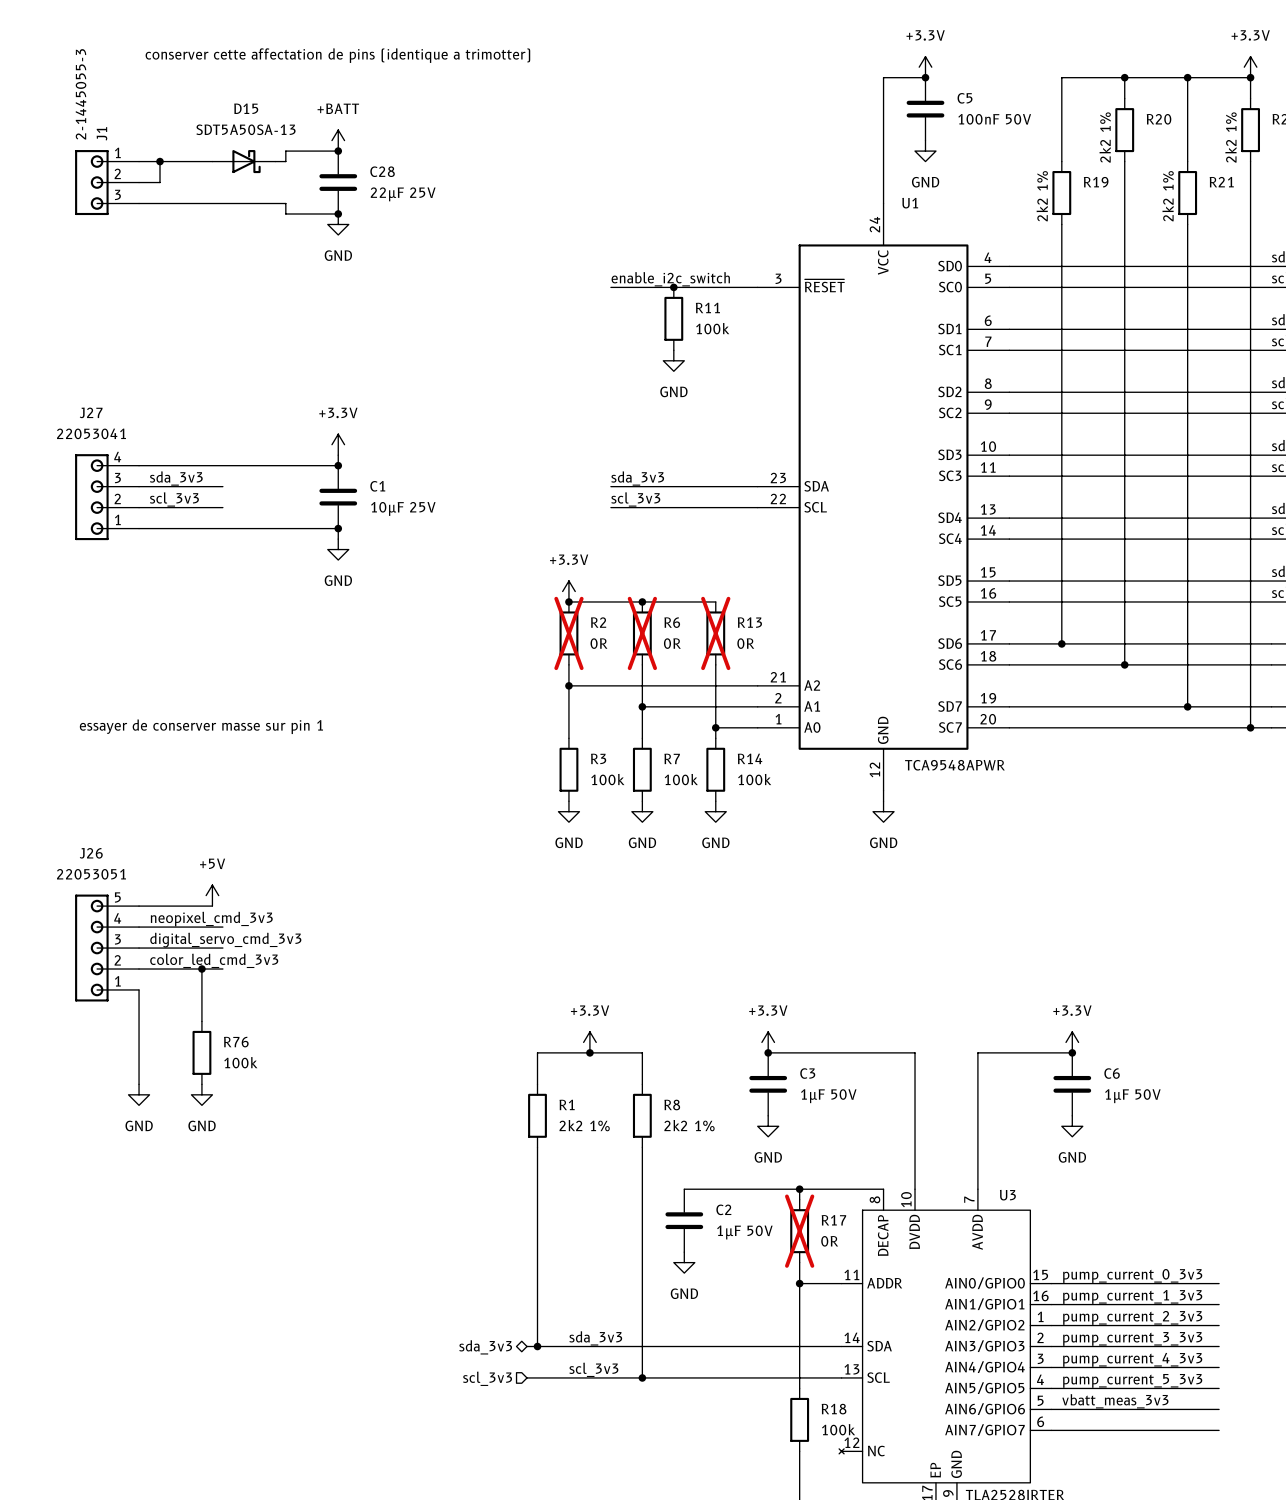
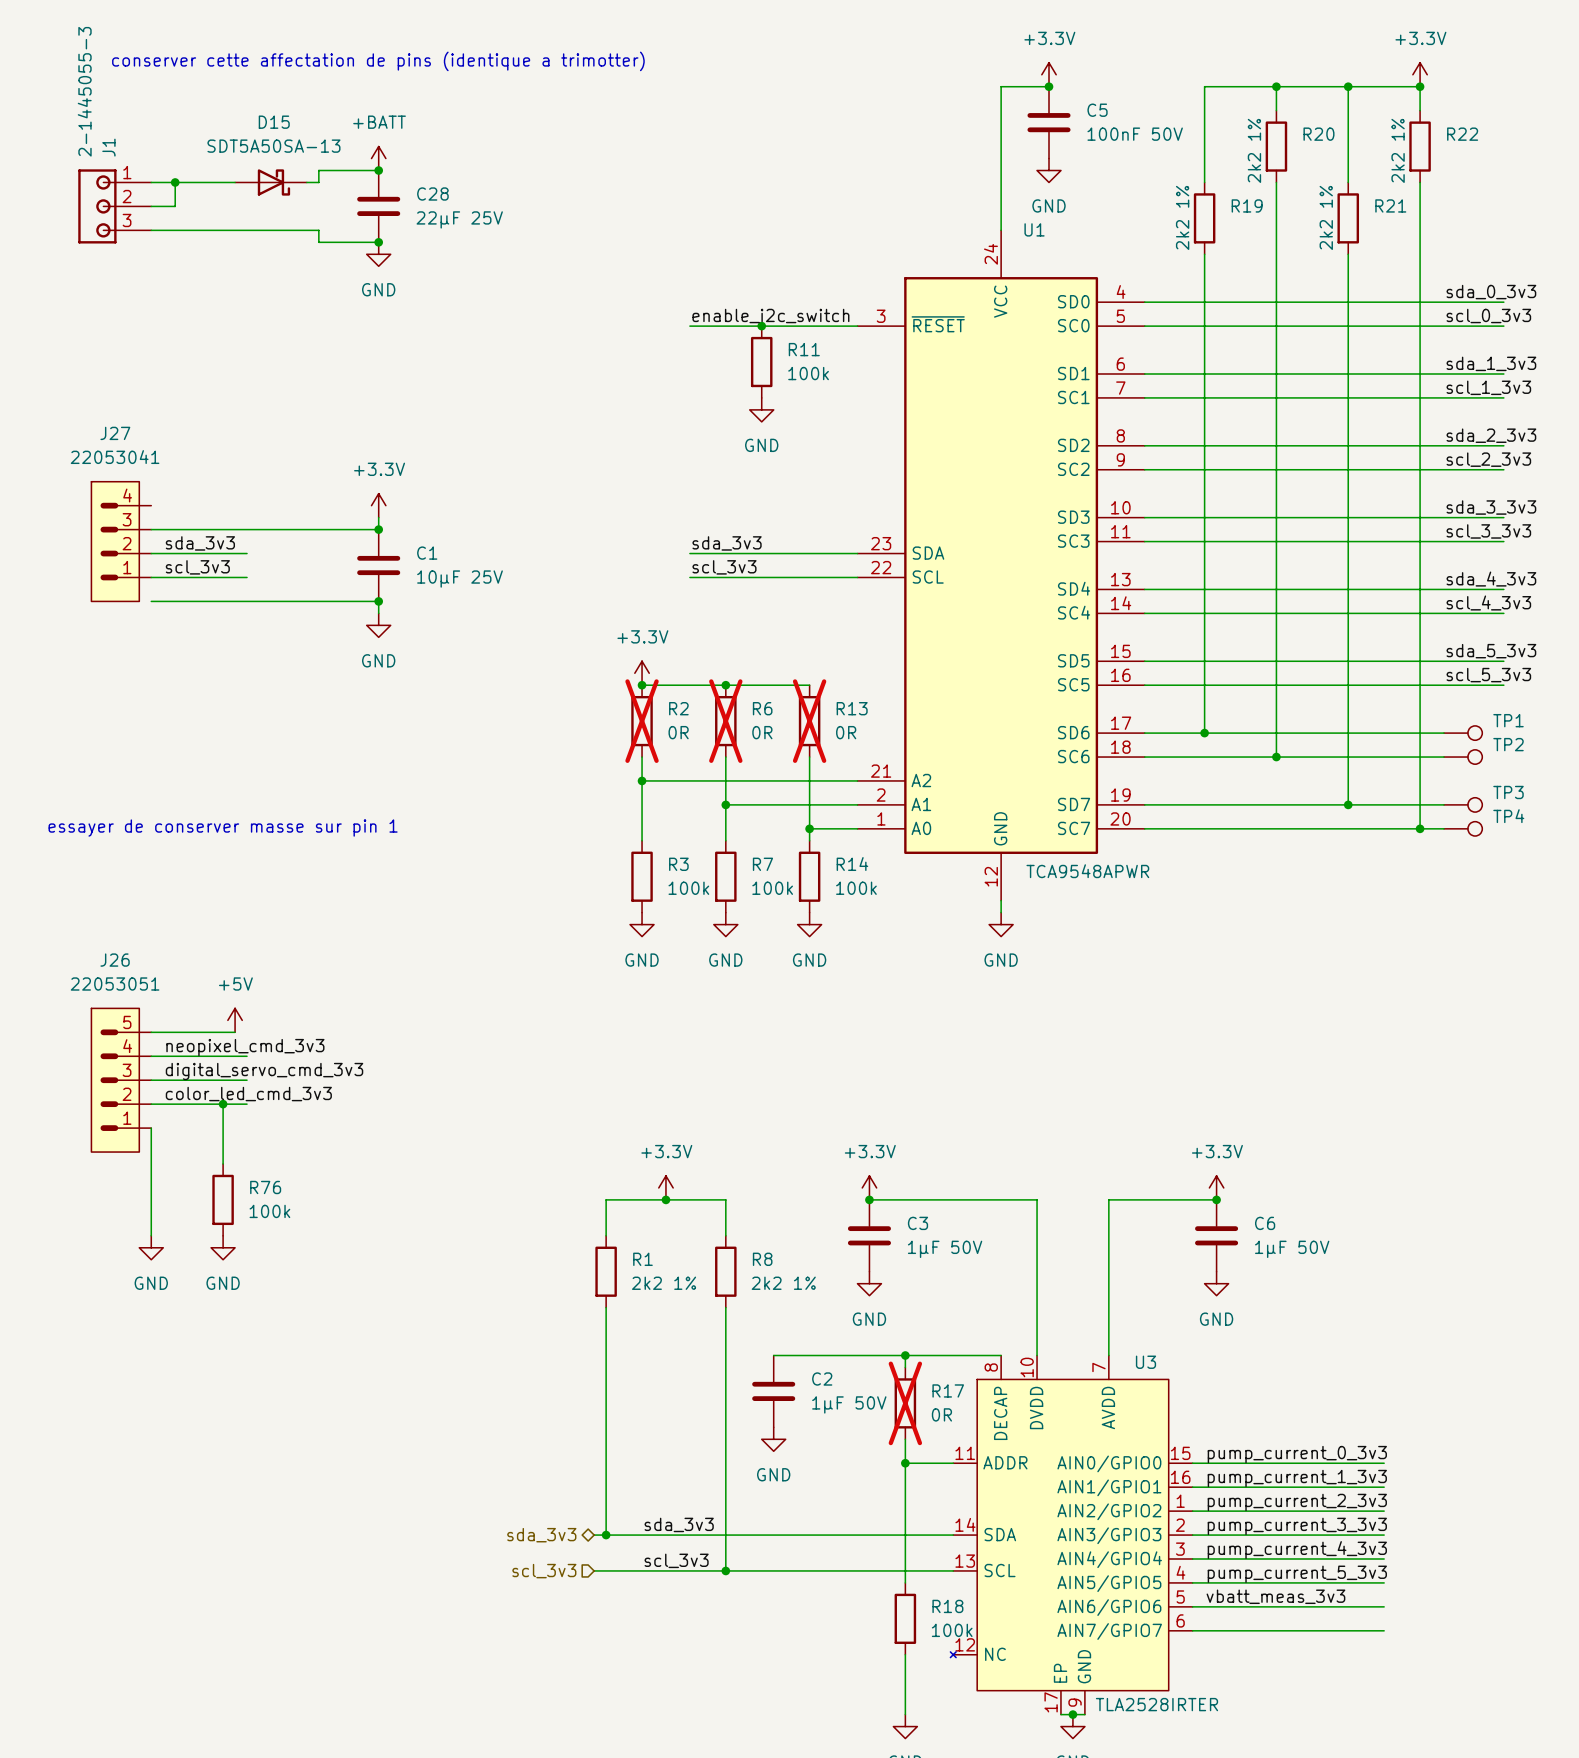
J27 symbol: [75, 454, 140, 541] -> [91, 481, 152, 602]
J26 symbol: [75, 894, 140, 1002] -> [91, 1008, 152, 1153]

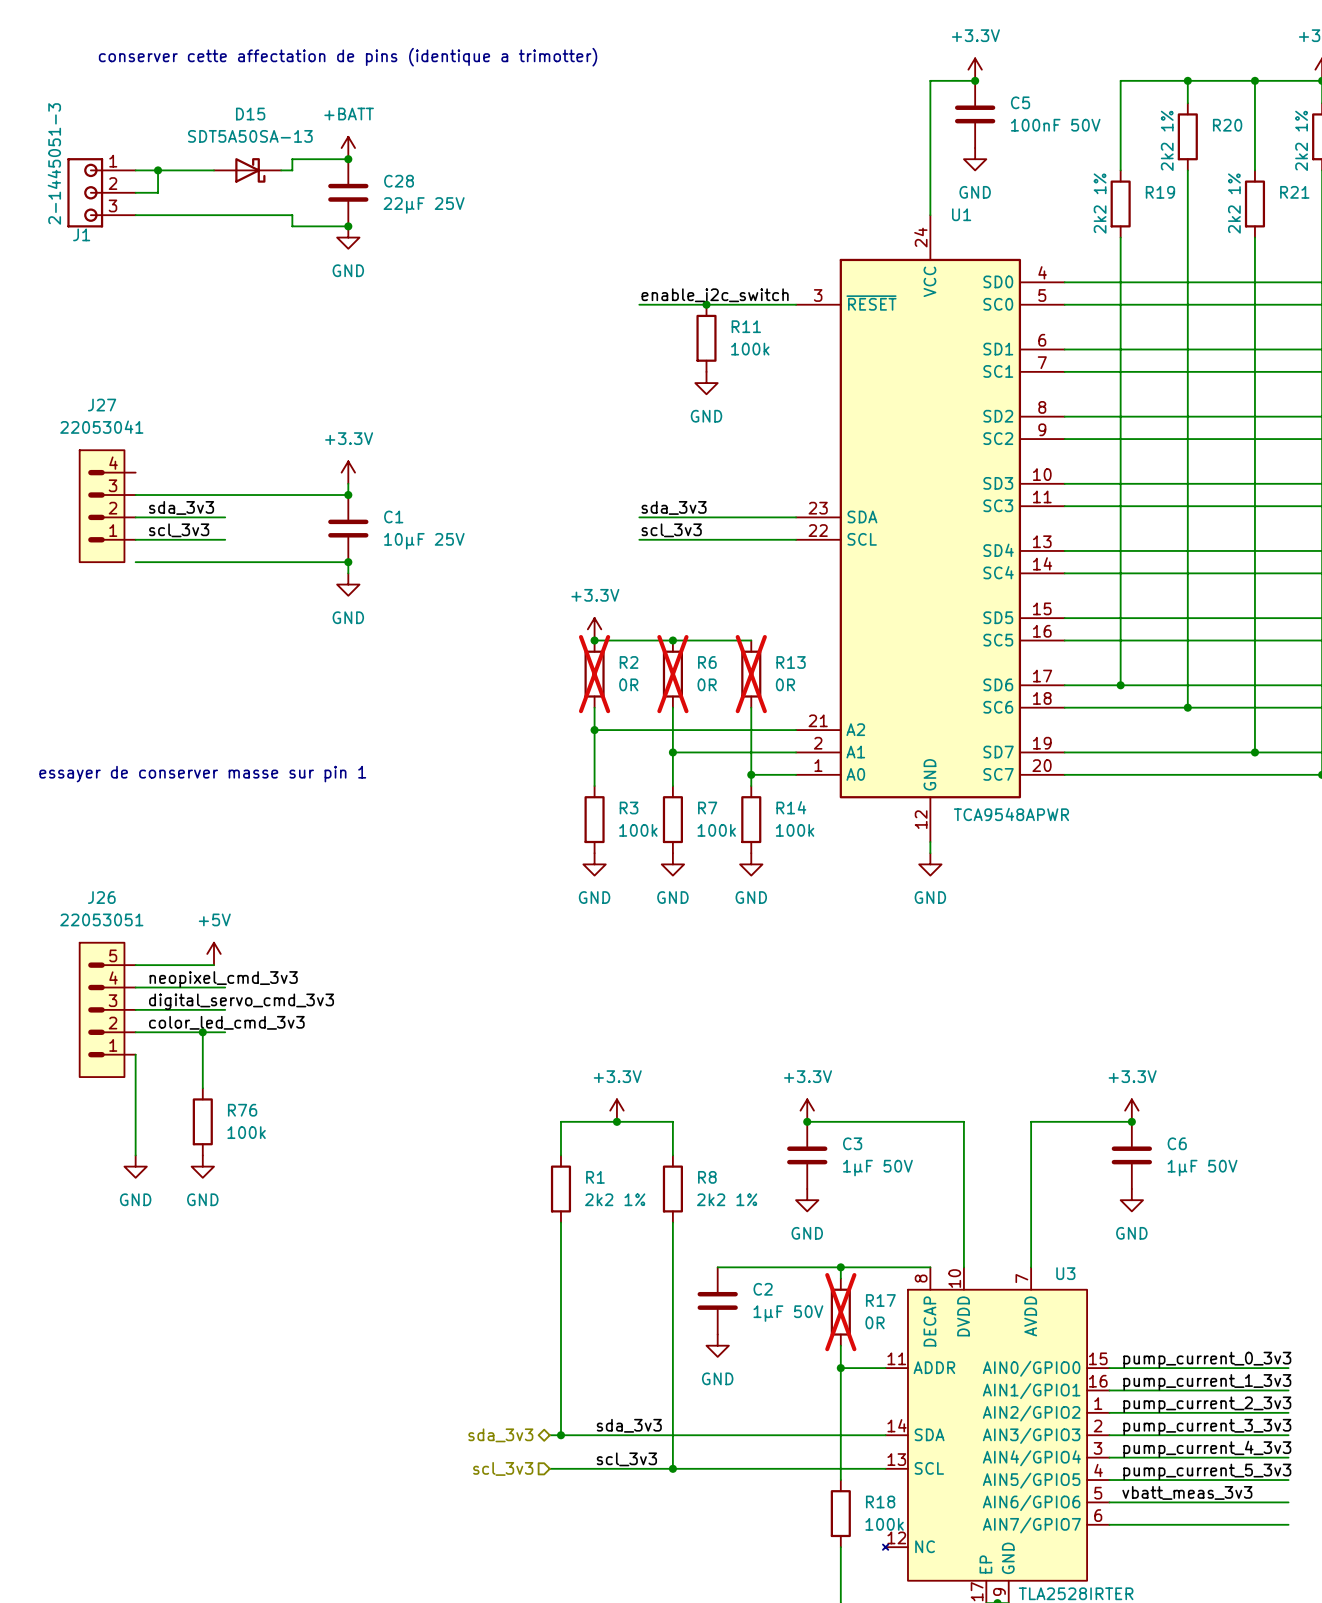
J1 value: 2-1445055-3 (84, 91) -> 2-1445051-3 (54, 163)
J1 name rotation: 0° (108, 147) -> 90° clockwise (81, 234)
J1 name position: J1 (108, 147) -> J1 (81, 234)

